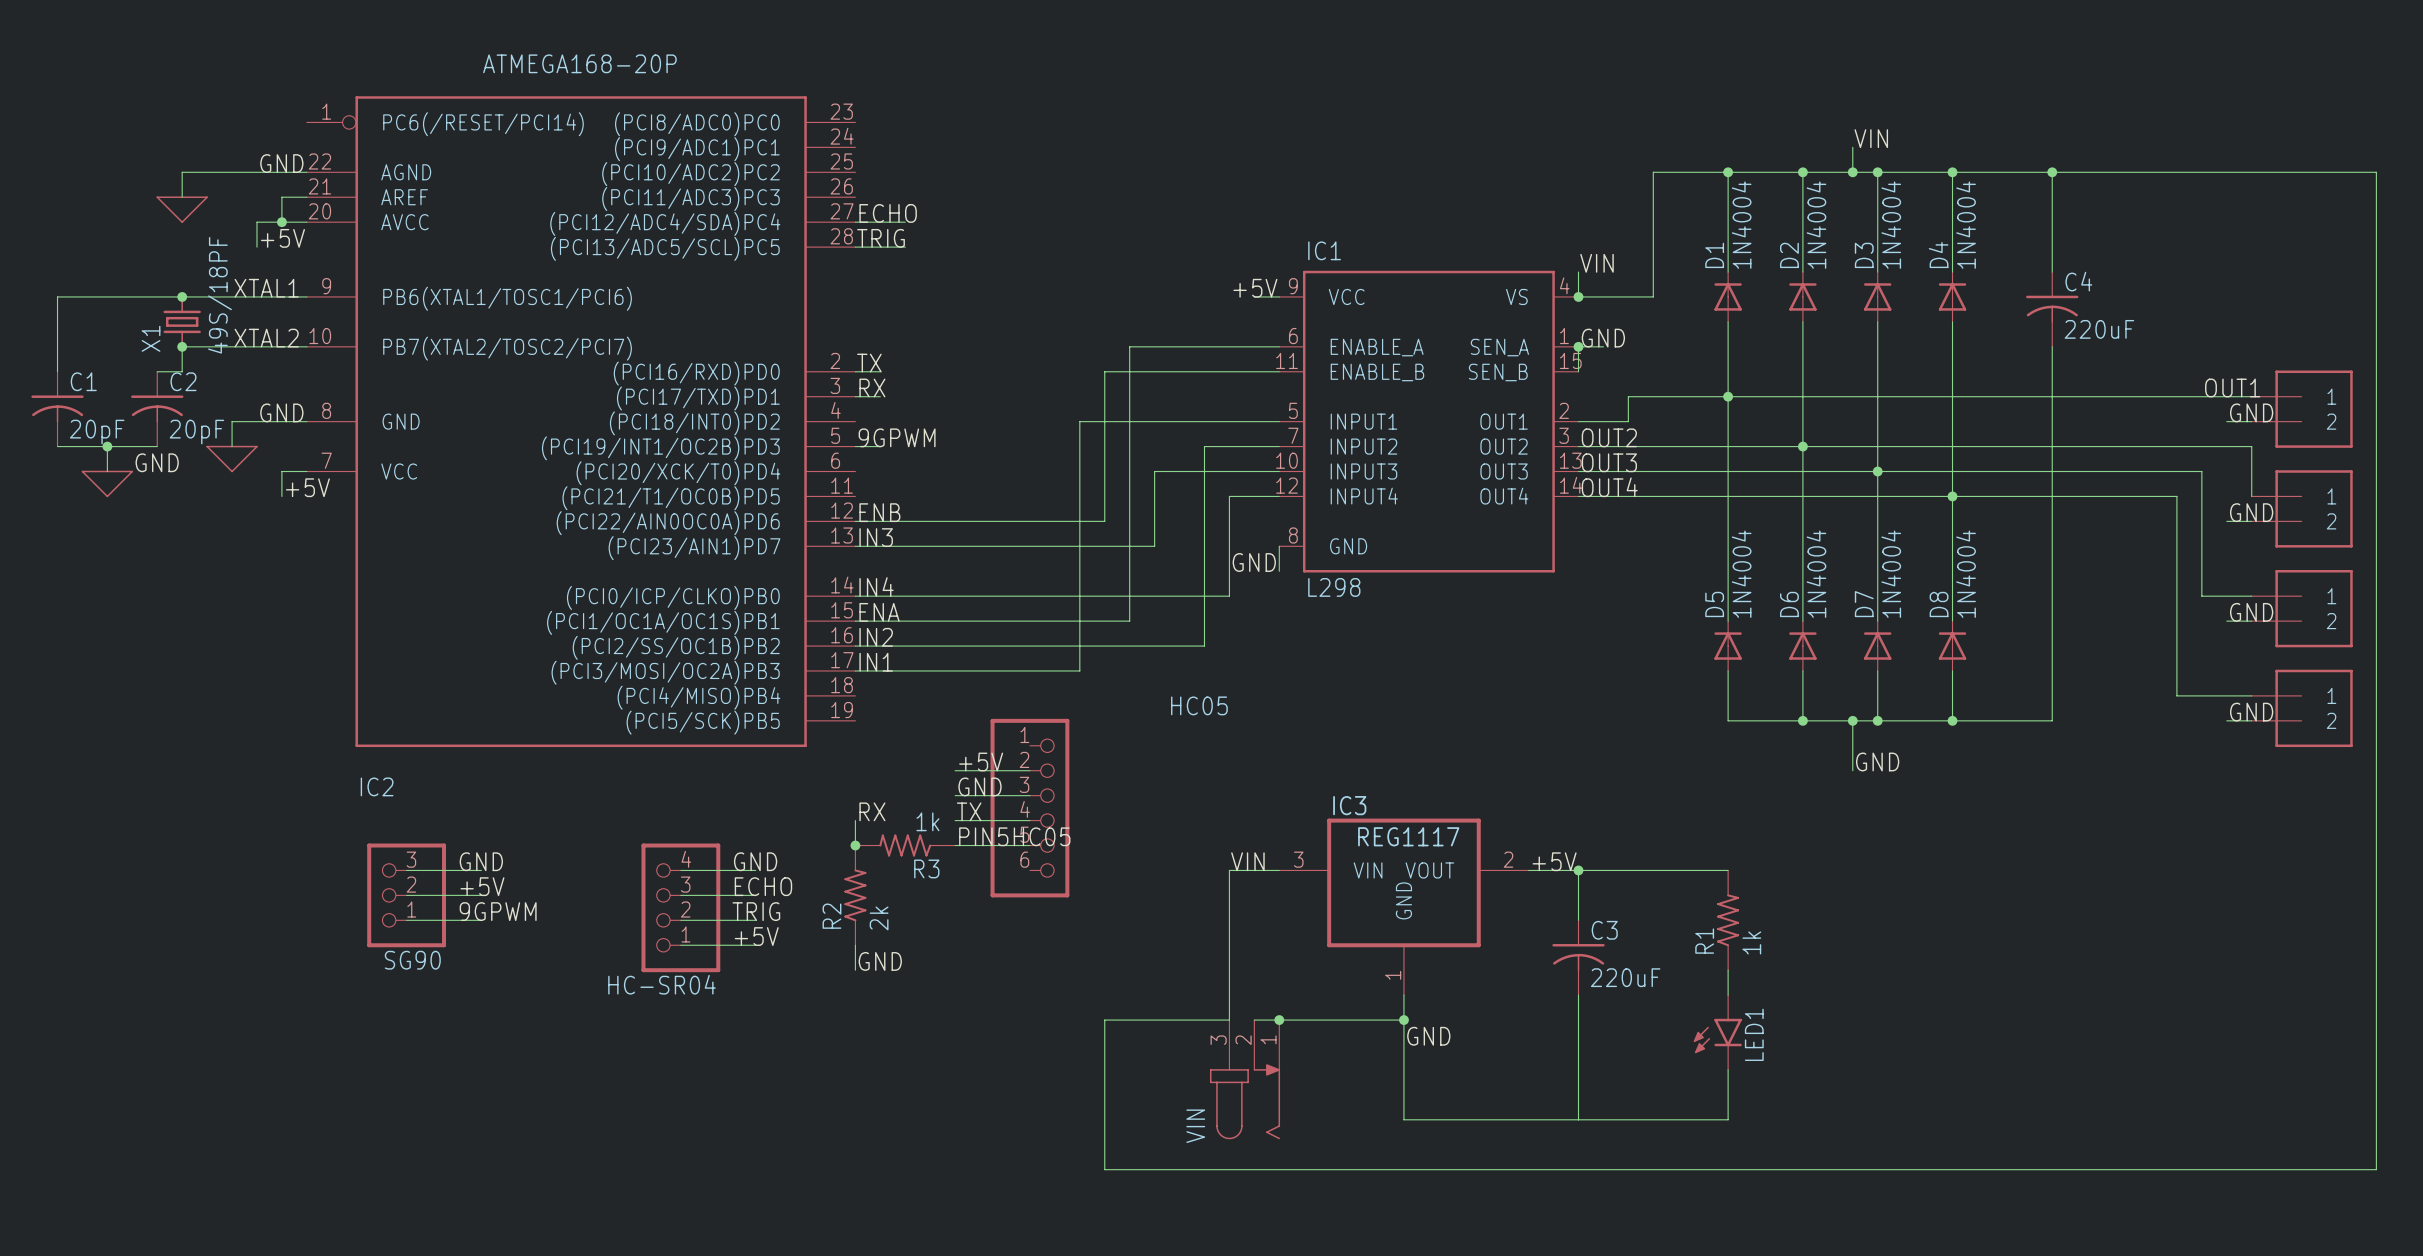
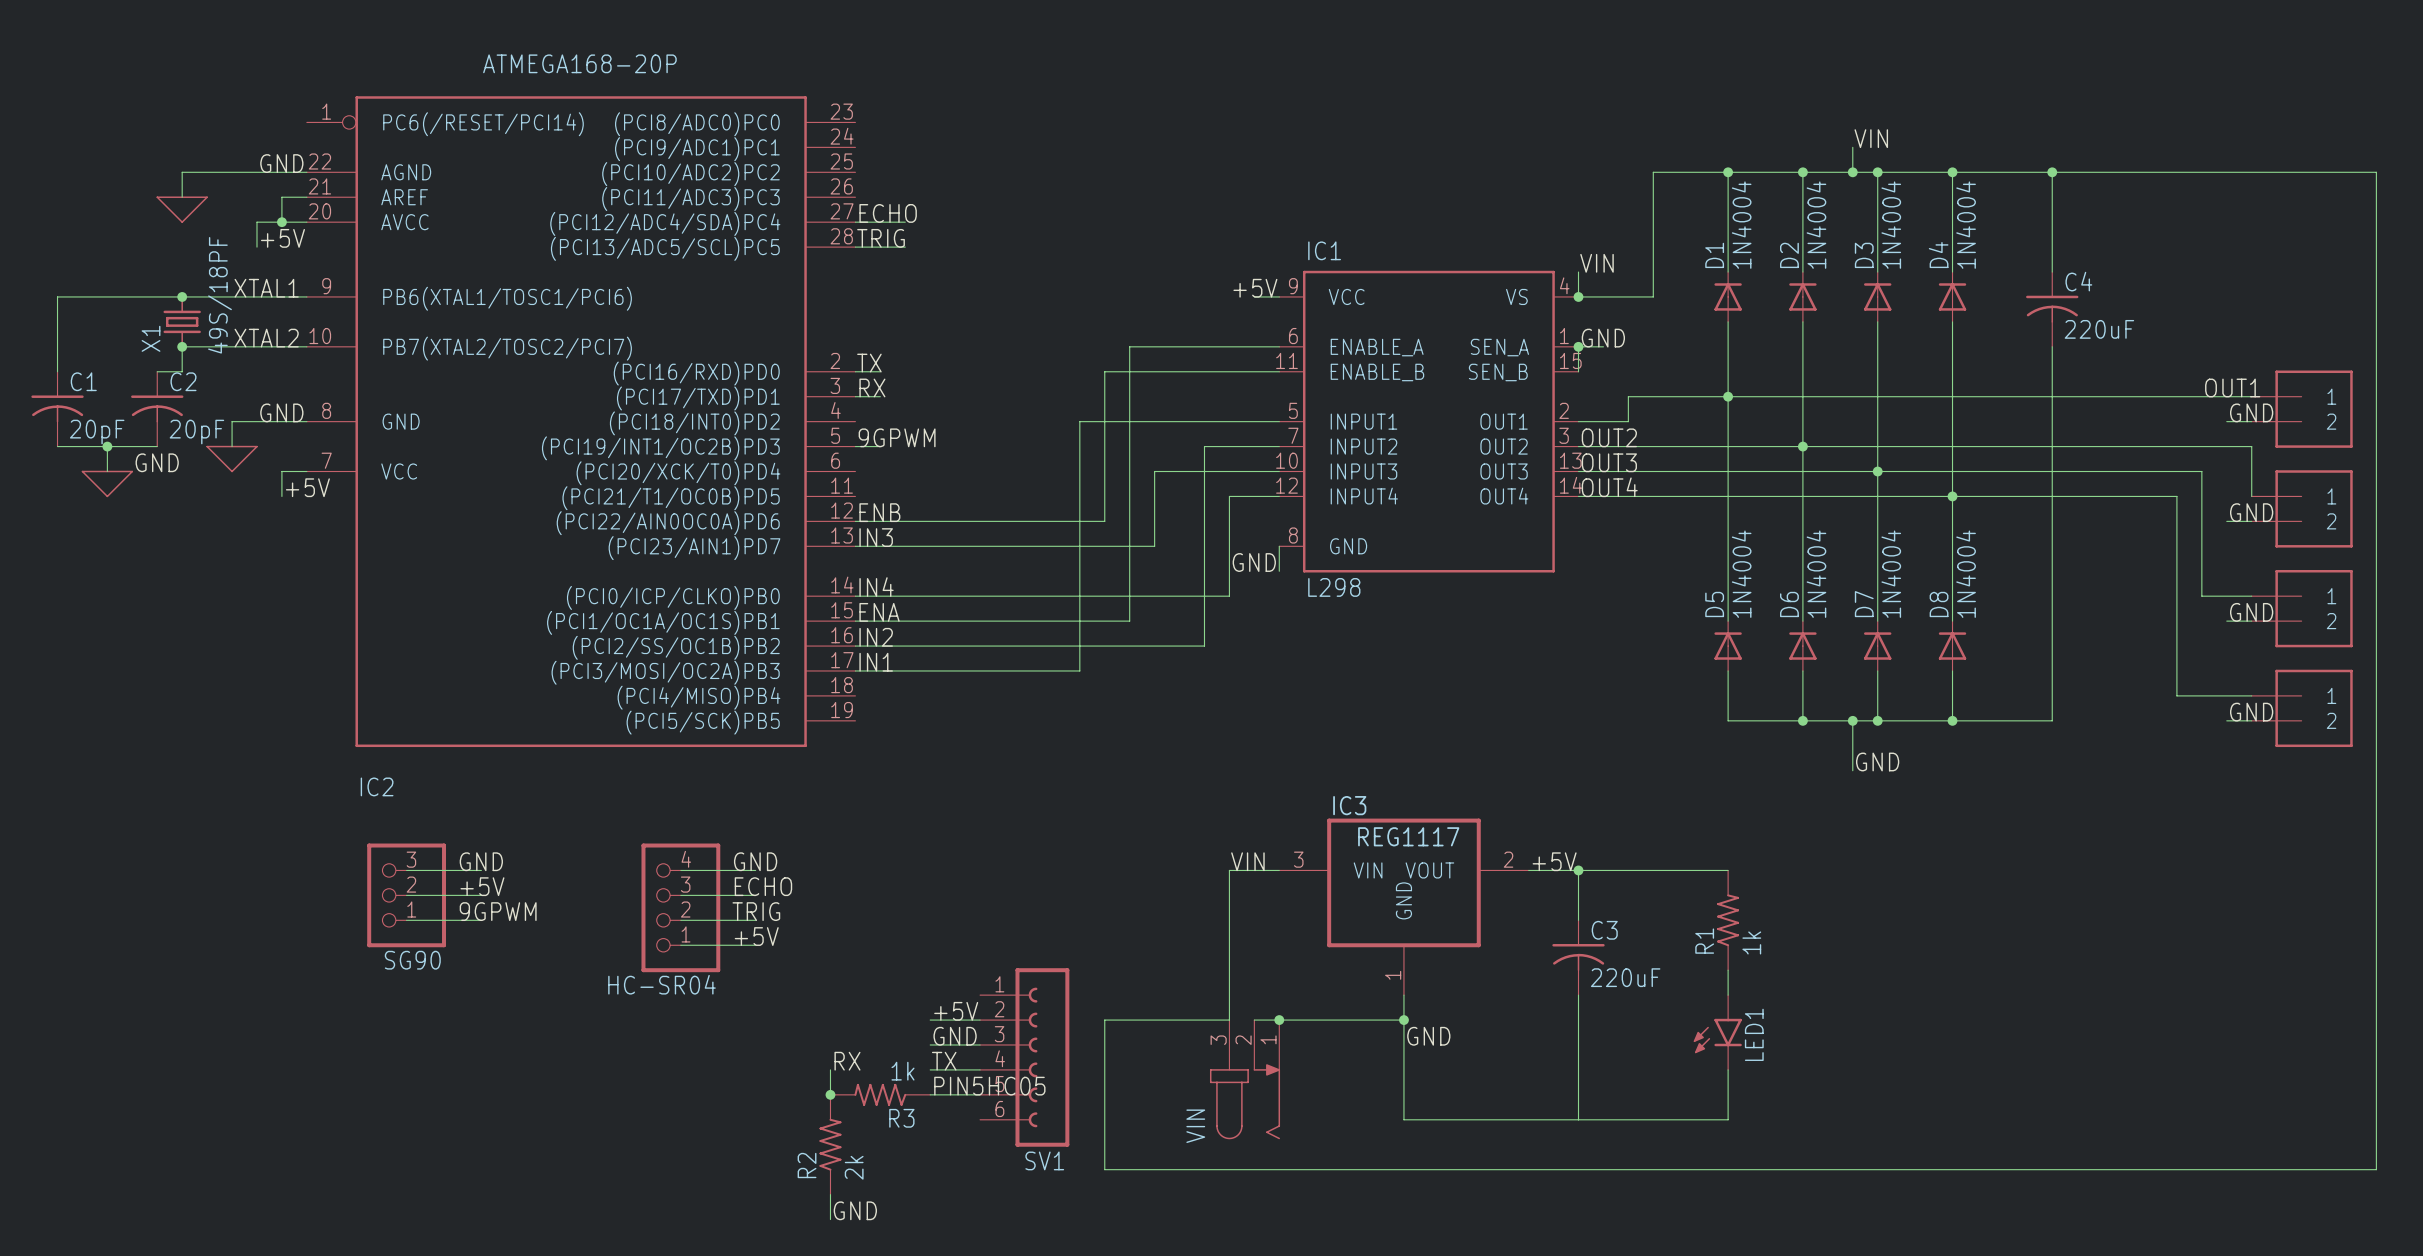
label: +5V (981, 761) -> none
wire: (955, 770) (1029, 770) -> none
label: GND (980, 786) -> none
wire: (955, 795) (1029, 795) -> none
HC05: (1029, 808) -> none
label: RX (872, 811) -> none
label: TX (969, 811) -> none
wire: (855, 820) (855, 845) -> none
wire: (955, 820) (1029, 820) -> none
label: PIN5HC05 (1014, 836) -> none
junction: (855, 845) -> none
R3 position: (905, 845) -> (880, 1094)
wire: (955, 845) (1029, 845) -> none
R2 position: (855, 895) -> (830, 1144)
wire: (855, 945) (855, 970) -> (830, 1069) (830, 1094)
label position: GND (880, 961) -> GND (955, 1036)
label: none -> +5V (956, 1011)
wire: none -> (930, 1020) (980, 1020)
wire: none -> (930, 1044) (980, 1044)
SV1: none -> (1024, 1057)
label: none -> RX (847, 1061)
label: none -> TX (944, 1061)
wire: none -> (930, 1069) (980, 1069)
label: none -> PIN5HC05 (989, 1086)
junction: none -> (830, 1094)
wire: none -> (930, 1094) (980, 1094)
wire: none -> (830, 1194) (830, 1219)
label: none -> GND (855, 1210)

